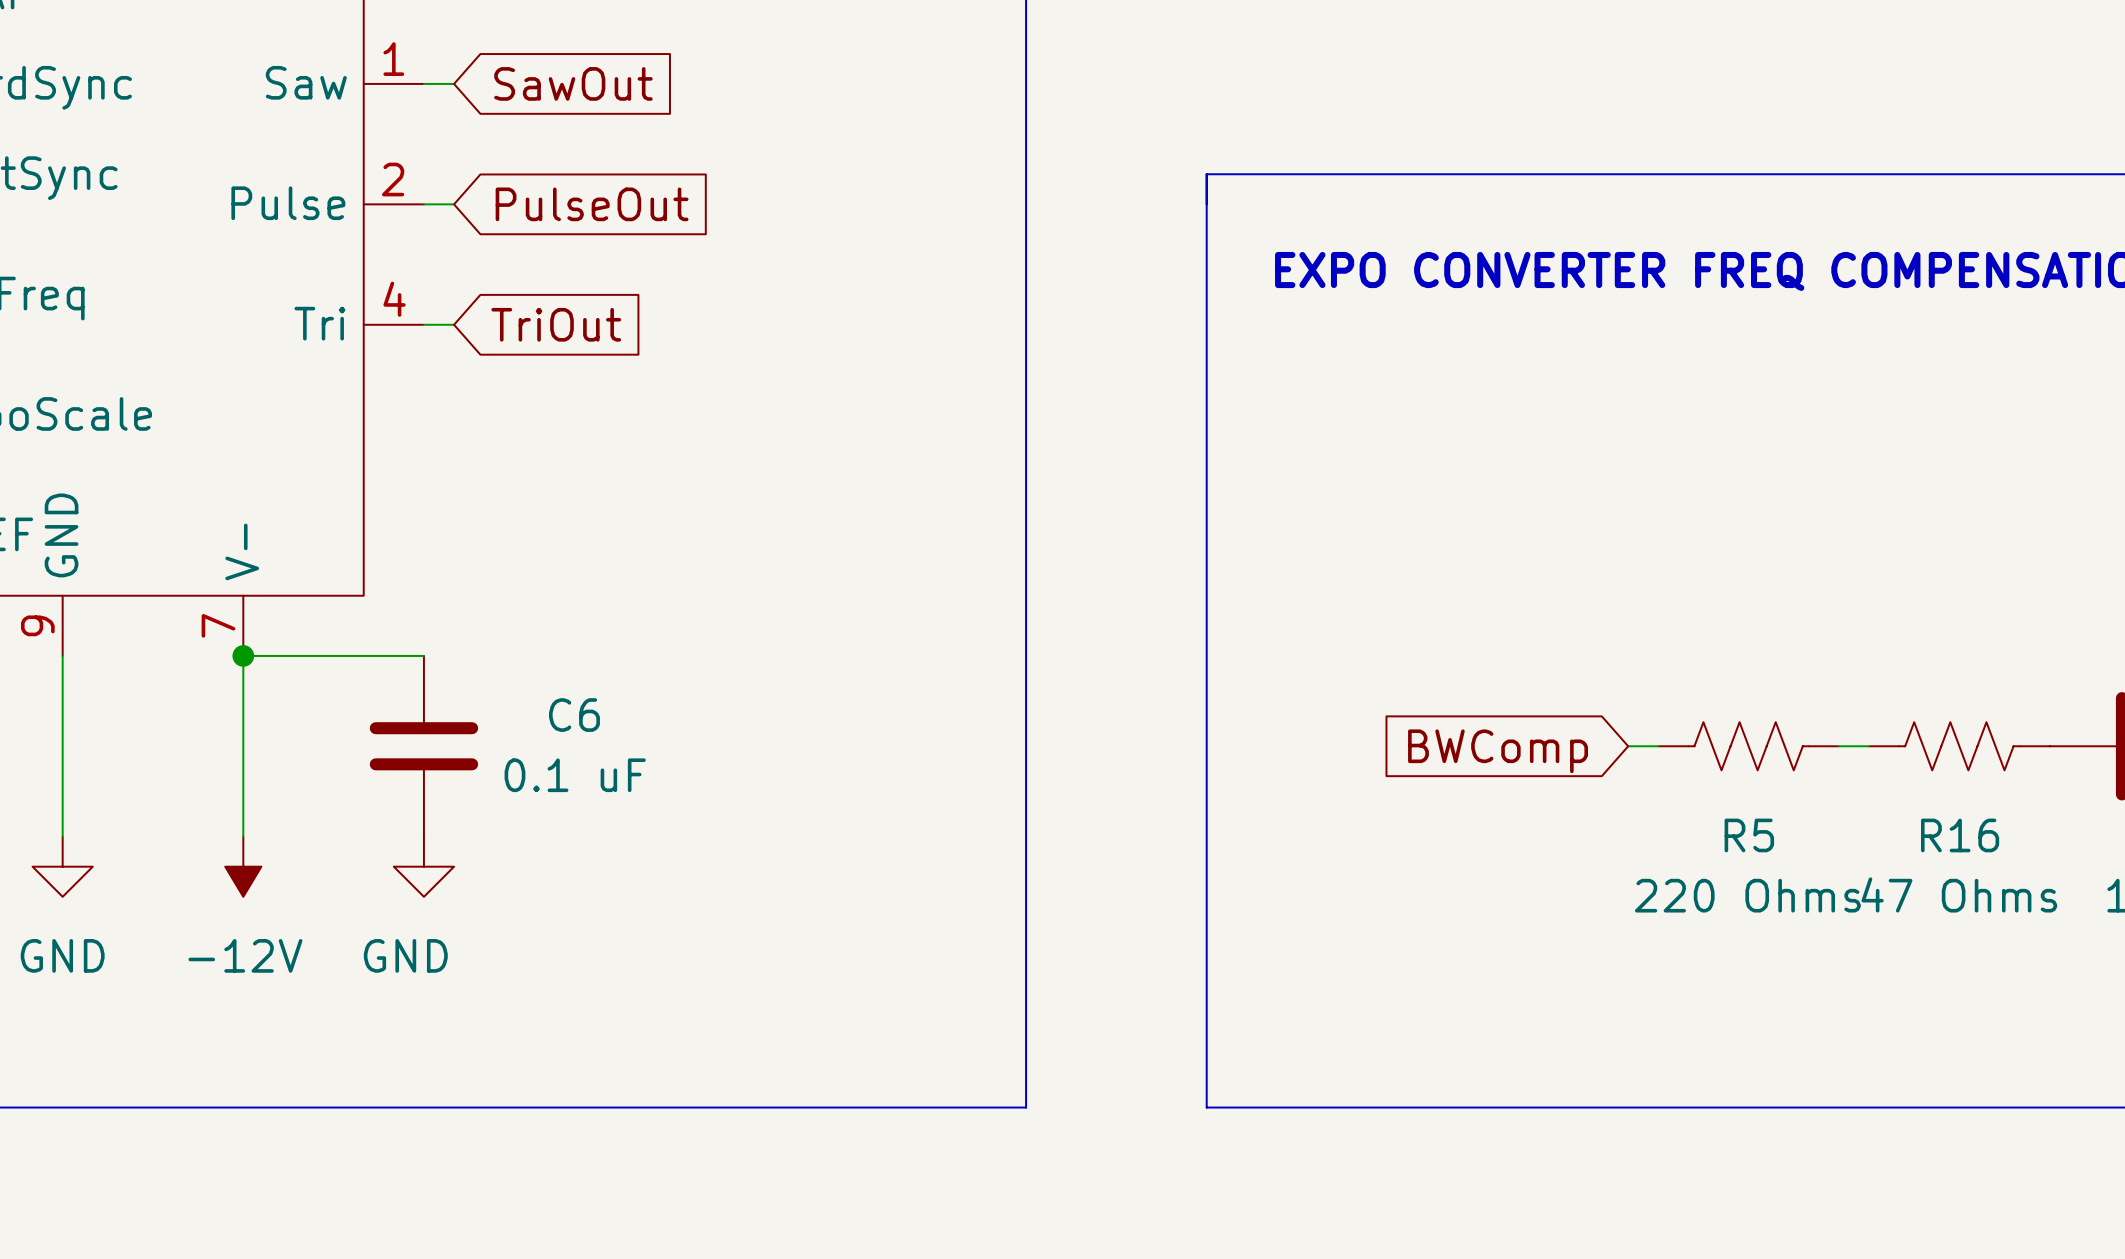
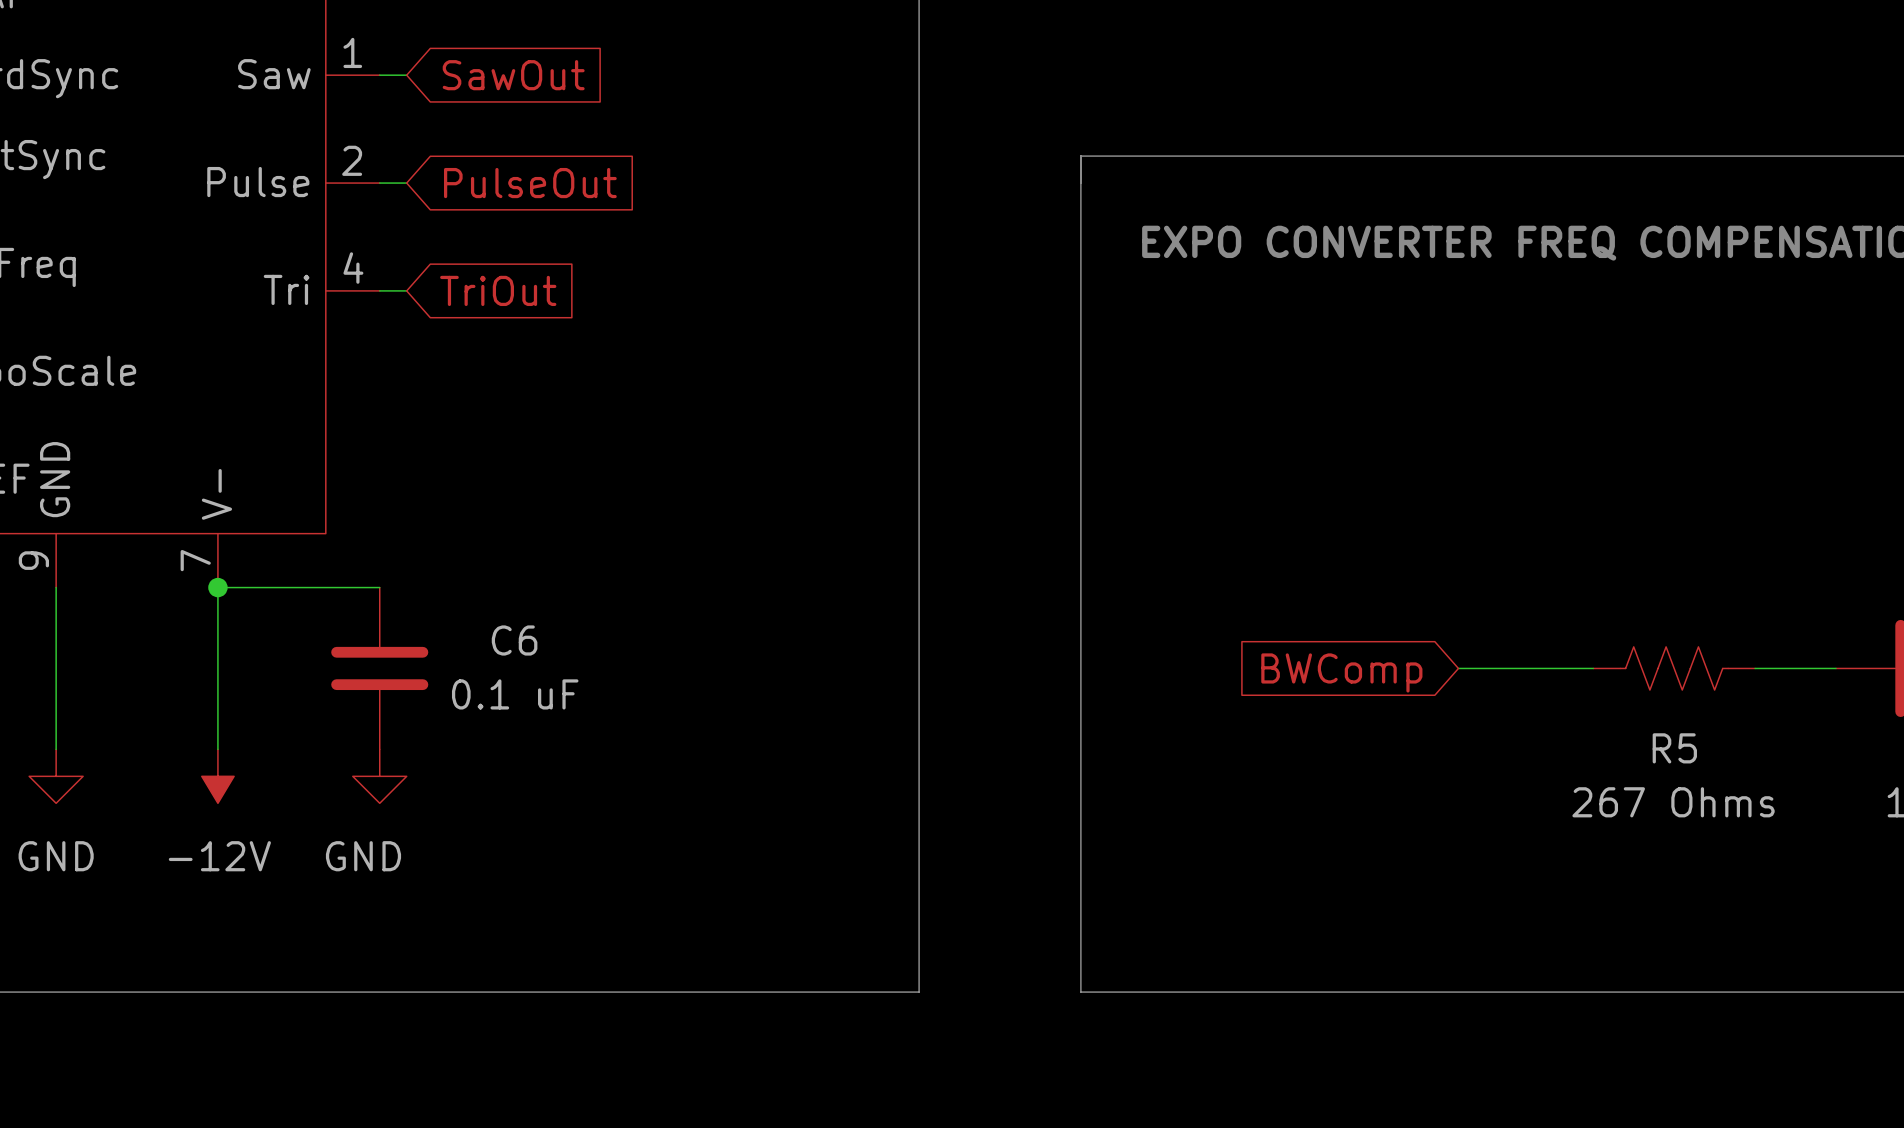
wire: none -> (1485, 668) (1593, 668)
R5 position: (1748, 746) -> (1674, 668)
wire: (1838, 746) (1869, 746) -> none
wire: none -> (1755, 668) (1835, 668)
R16: 47 Ohms (1959, 746) -> none
R5 value: 220 Ohms (1747, 895) -> 267 Ohms (1673, 802)

